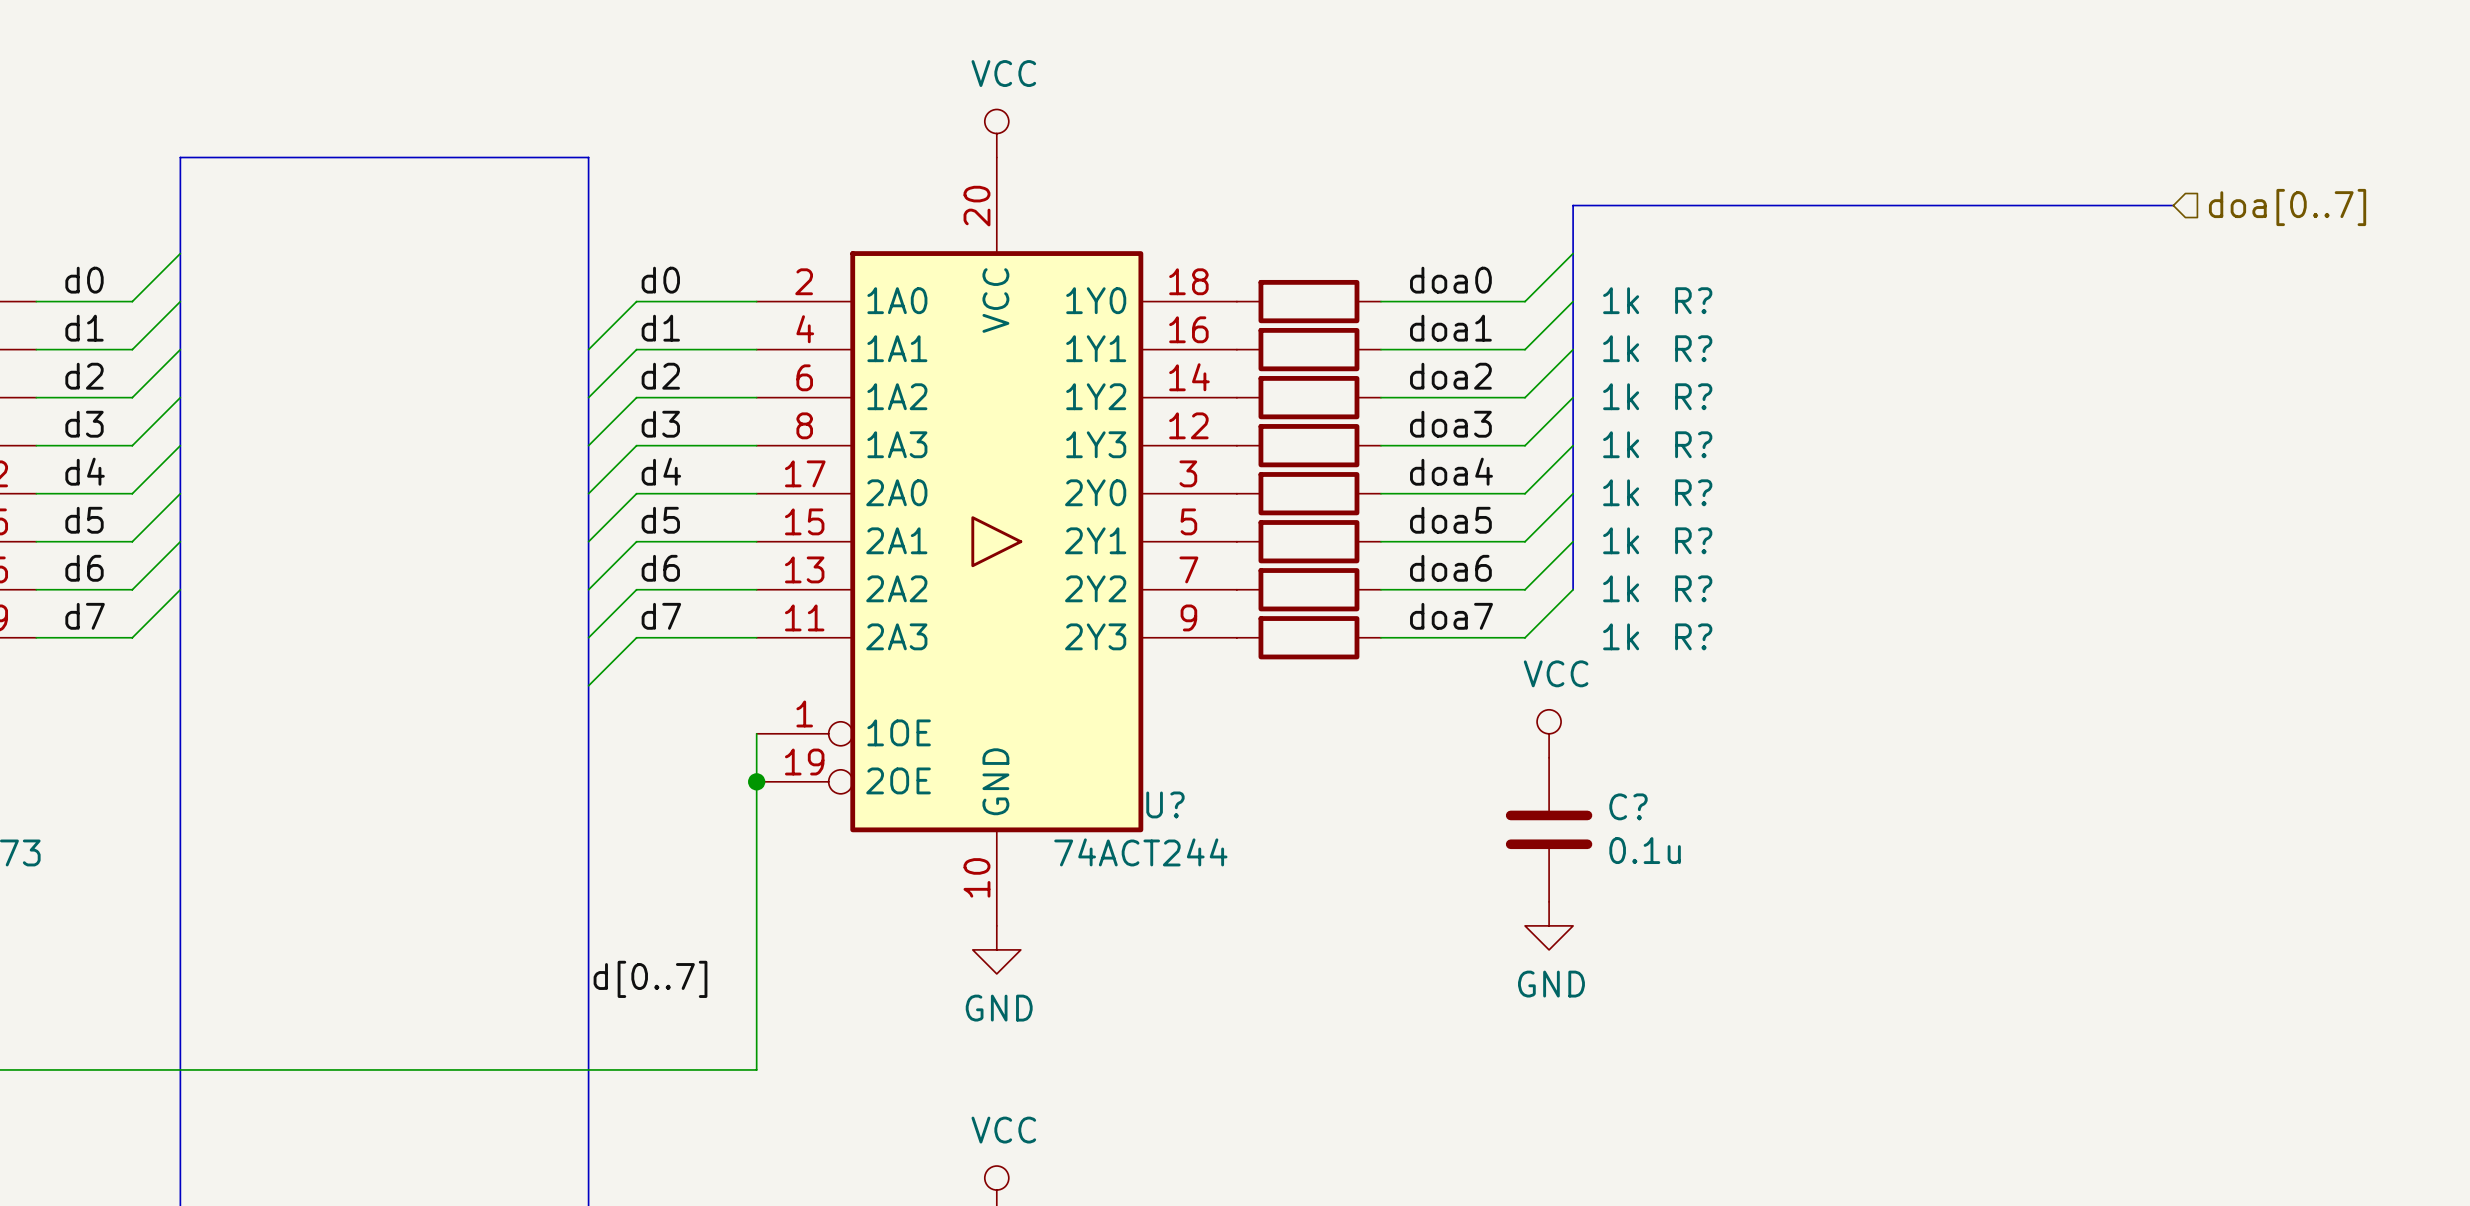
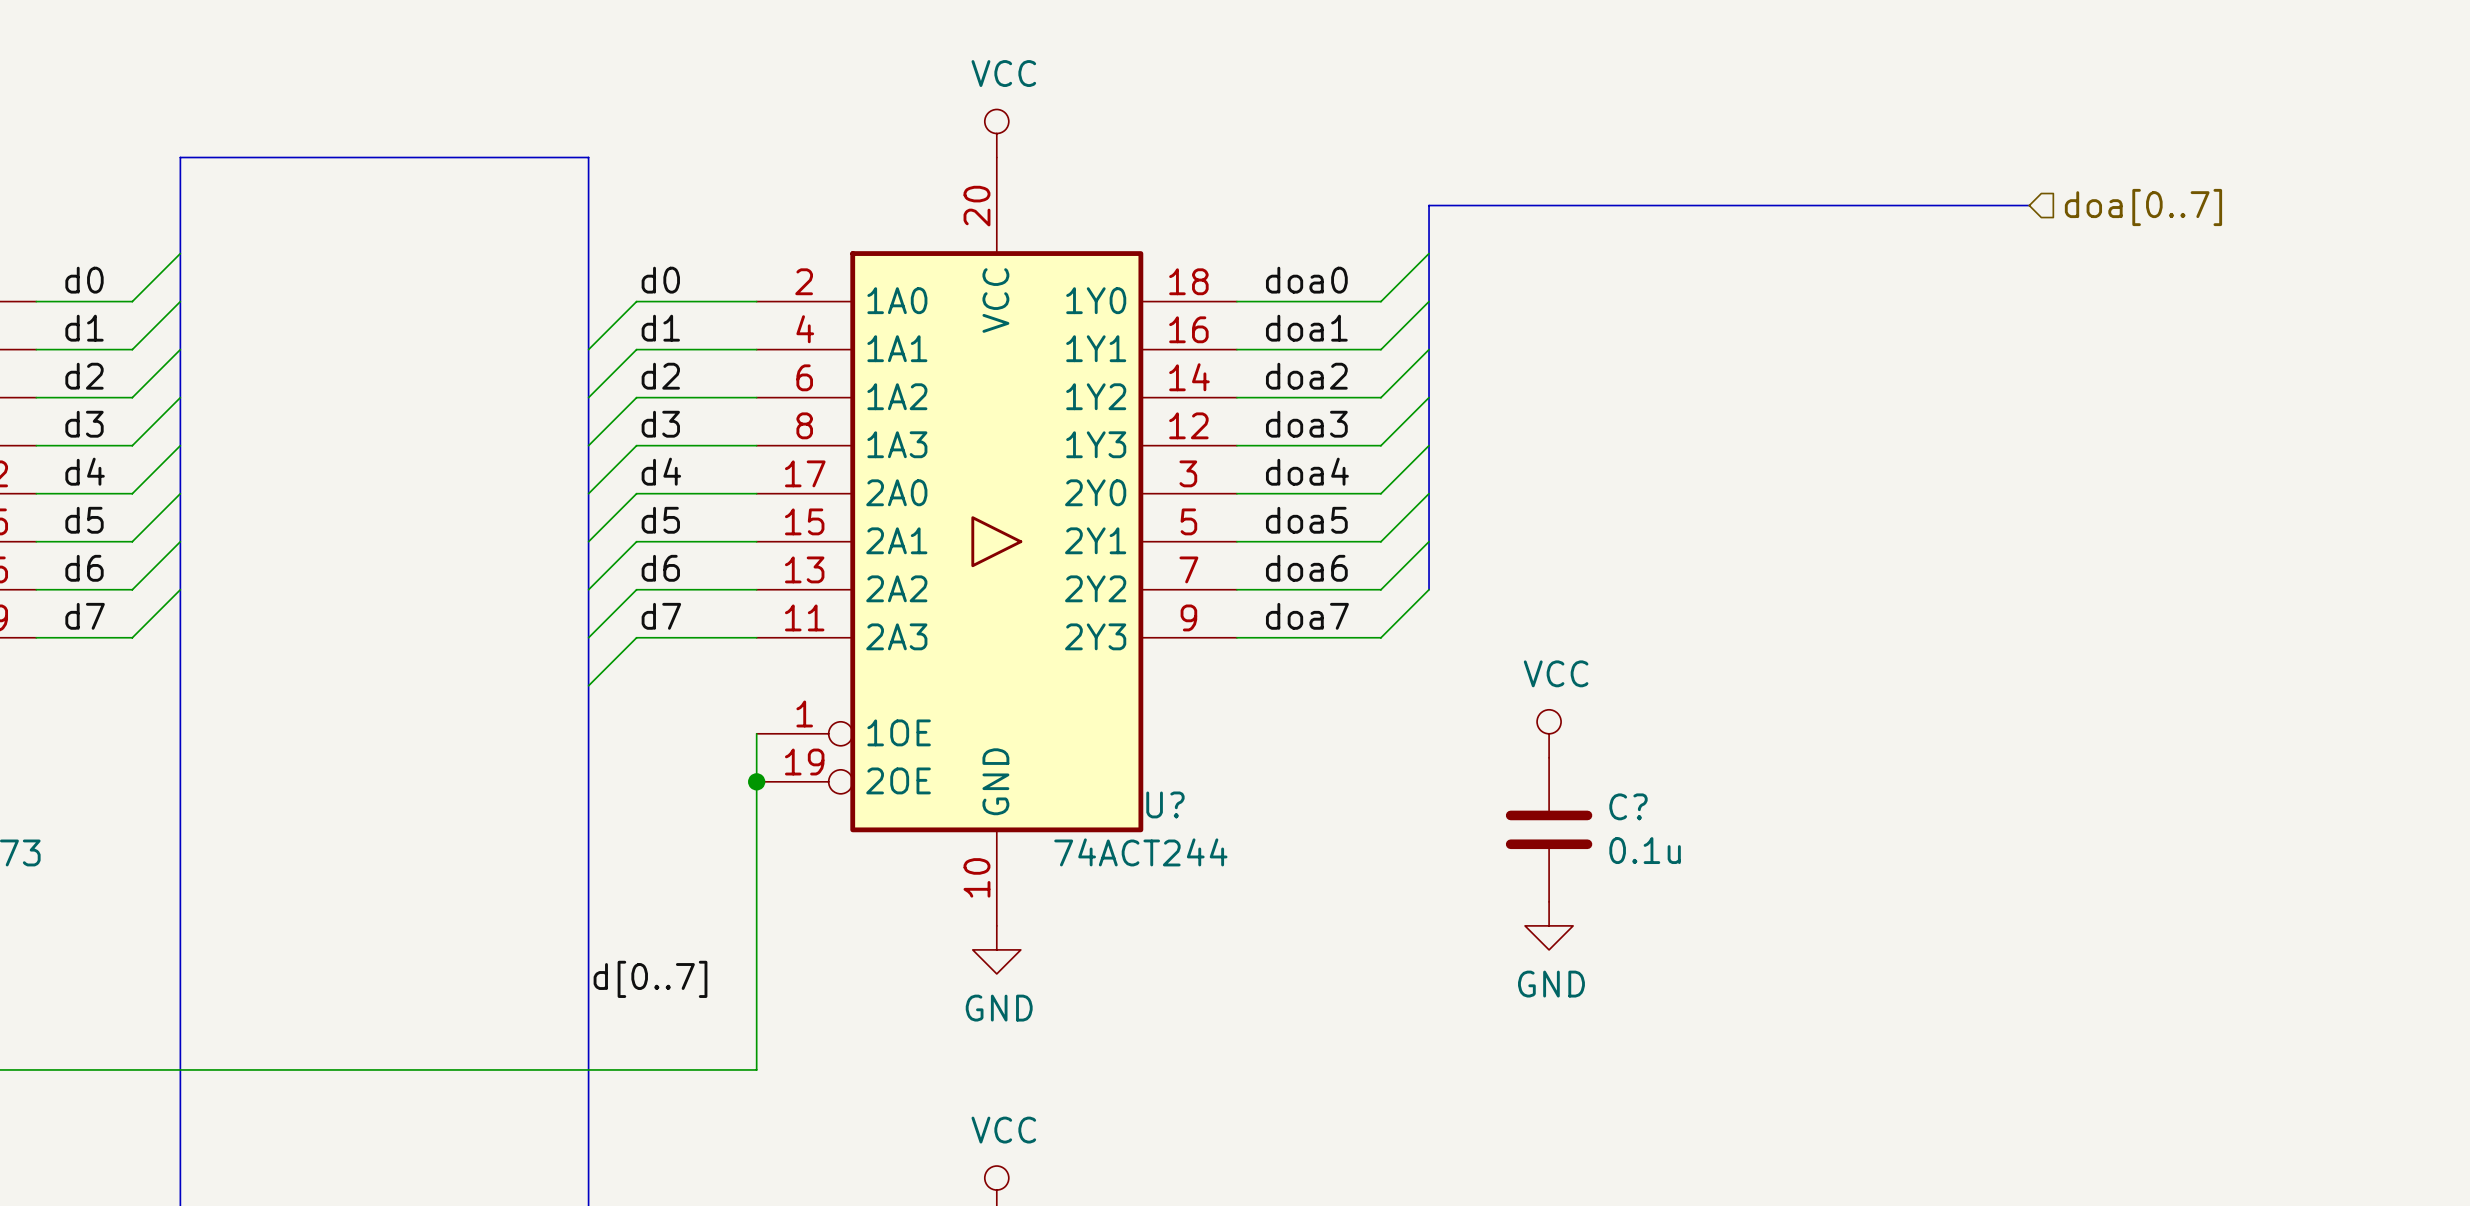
bus: (1573, 205) (1573, 589) -> (1573, 205) (1429, 205) (1429, 589)
bus: (2029, 205) (2173, 205) -> none
hierarchical label position: doa[0..7] (2287, 207) -> doa[0..7] (2143, 207)
wire: (1573, 253) (1525, 301) (1380, 301) -> (1429, 253) (1380, 301) (1236, 301)
label position: doa0 (1450, 280) -> doa0 (1306, 280)
R?: 1k (1308, 301) -> none
wire: (1573, 301) (1525, 349) (1380, 349) -> (1429, 301) (1380, 349) (1236, 349)
label position: doa1 (1450, 328) -> doa1 (1306, 328)
R?: 1k (1308, 349) -> none
wire: (1573, 349) (1525, 397) (1380, 397) -> (1429, 349) (1380, 397) (1236, 397)
label position: doa2 (1450, 376) -> doa2 (1306, 376)
R?: 1k (1308, 397) -> none
wire: (1573, 397) (1525, 445) (1380, 445) -> (1429, 397) (1380, 445) (1236, 445)
label position: doa3 (1450, 424) -> doa3 (1306, 424)
R?: 1k (1308, 445) -> none
wire: (1573, 445) (1525, 493) (1380, 493) -> (1429, 445) (1380, 493) (1236, 493)
label position: doa4 (1451, 471) -> doa4 (1307, 471)
R?: 1k (1308, 493) -> none
wire: (1573, 493) (1525, 541) (1380, 541) -> (1429, 493) (1380, 541) (1236, 541)
label position: doa5 (1450, 520) -> doa5 (1306, 520)
R?: 1k (1308, 541) -> none
wire: (1573, 541) (1525, 589) (1380, 589) -> (1429, 541) (1380, 589) (1236, 589)
label position: doa6 (1450, 568) -> doa6 (1306, 568)
R?: 1k (1308, 589) -> none
wire: (1573, 589) (1525, 637) (1380, 637) -> (1429, 589) (1380, 637) (1236, 637)
label position: doa7 (1451, 616) -> doa7 (1307, 616)
R?: 1k (1308, 637) -> none

